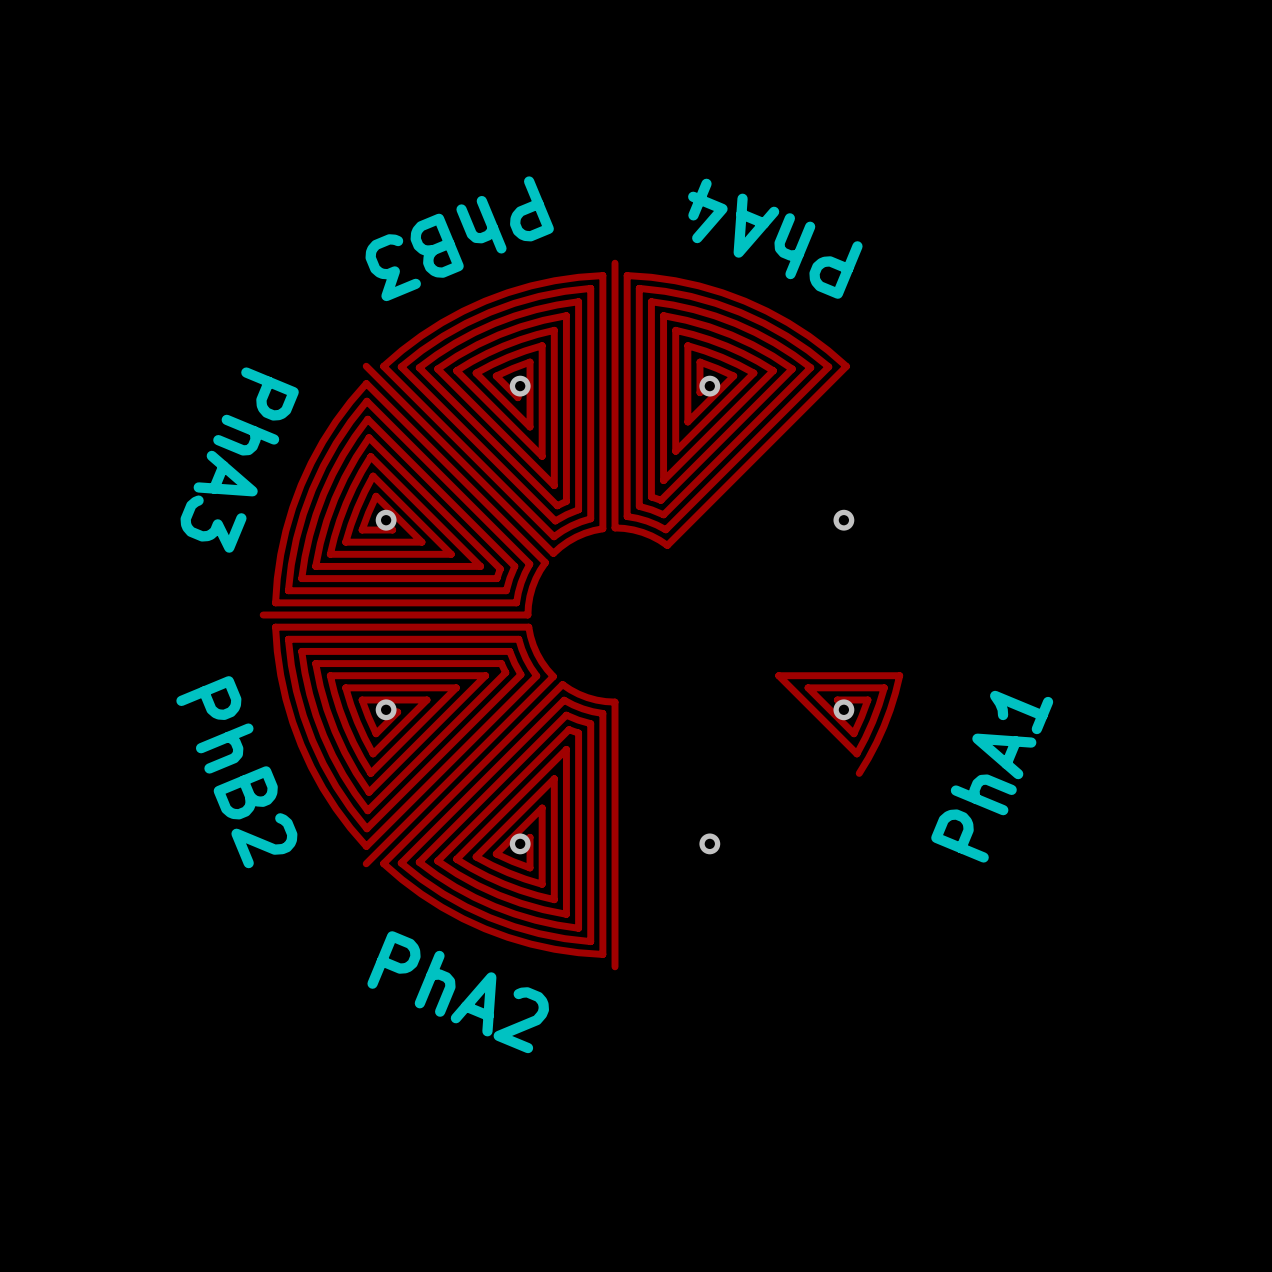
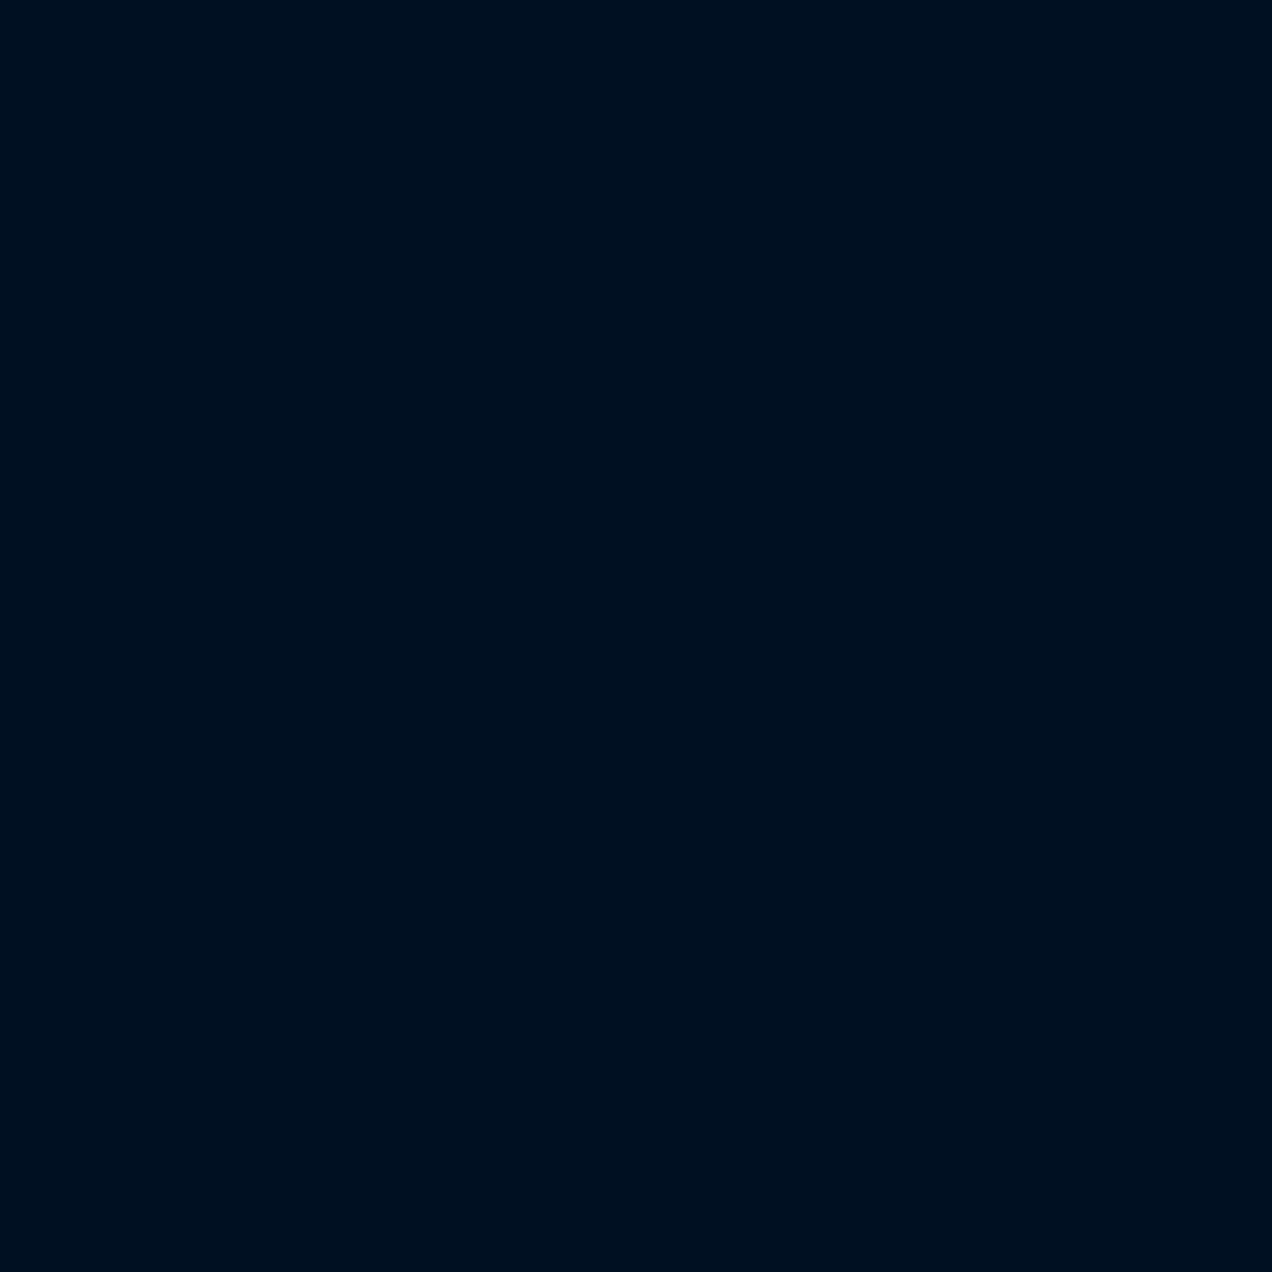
text: PhB3 (459, 238) -> none
text: PhA4 (775, 238) -> none
track: (615, 263) (615, 527) (642, 532) (667, 545) (846, 366) (808, 335) (788, 322) (744, 301) (699, 285) (675, 280) (627, 275) (627, 516) (647, 521) (665, 529) (828, 366) (786, 336) (740, 312) (690, 296) (639, 288) (639, 506) (663, 514) (810, 367) (774, 343) (735, 323) (694, 309) (651, 301) (651, 496) (660, 500) (792, 369) (752, 344) (731, 334) (709, 326) (663, 315) (663, 480) (773, 370) (726, 346) (675, 330) (675, 451) (753, 373) (721, 357) (687, 345) (687, 421) (733, 376) (699, 362) (699, 392) (709, 386) -> none
track: (366, 366) (553, 553) (576, 537) (602, 528) (602, 275) (578, 277) (531, 285) (485, 301) (441, 322) (421, 335) (383, 366) (553, 536) (571, 525) (590, 518) (590, 288) (539, 296) (489, 312) (443, 336) (401, 366) (555, 520) (578, 509) (578, 301) (535, 309) (494, 323) (455, 343) (419, 367) (557, 505) (566, 501) (566, 315) (520, 326) (498, 334) (477, 344) (437, 369) (554, 485) (554, 330) (503, 346) (456, 370) (542, 456) (542, 345) (508, 357) (476, 373) (530, 427) (530, 362) (496, 376) (517, 397) (520, 386) -> none
via: (520, 386) -> none
via: (709, 386) -> none
text: PhA3 (239, 460) -> none
track: (386, 520) (392, 530) (362, 530) (376, 496) (421, 542) (345, 542) (357, 508) (373, 476) (451, 554) (330, 554) (346, 503) (370, 456) (480, 566) (315, 566) (326, 520) (334, 498) (344, 477) (369, 437) (500, 569) (496, 578) (301, 578) (309, 535) (323, 494) (343, 455) (367, 419) (514, 566) (506, 590) (288, 590) (296, 539) (312, 489) (336, 443) (366, 401) (529, 564) (521, 582) (516, 602) (275, 602) (280, 554) (285, 531) (301, 485) (311, 462) (335, 421) (366, 383) (545, 562) (532, 587) (527, 615) (263, 615) -> none
via: (386, 520) -> none
via: (843, 520) -> none
track: (386, 709) (397, 712) (376, 733) (362, 699) (427, 699) (373, 753) (357, 721) (345, 687) (456, 687) (370, 773) (346, 726) (330, 675) (485, 675) (369, 792) (356, 772) (334, 731) (326, 709) (315, 663) (501, 663) (505, 672) (367, 810) (343, 774) (323, 735) (309, 694) (301, 651) (509, 651) (520, 674) (366, 828) (336, 786) (312, 740) (296, 690) (288, 639) (518, 639) (525, 658) (536, 676) (366, 846) (335, 808) (322, 788) (301, 744) (285, 699) (277, 651) (275, 627) (528, 627) (537, 653) (553, 676) (366, 863) -> none
via: (386, 709) -> none
track: (843, 709) (837, 699) (867, 699) (853, 733) (808, 687) (884, 687) (872, 721) (856, 753) (778, 675) (899, 675) (883, 726) (859, 773) -> none
via: (843, 709) -> none
text: PhB2 (236, 772) -> none
text: PhA1 (992, 776) -> none
track: (520, 843) (530, 837) (530, 867) (496, 853) (542, 808) (542, 884) (508, 872) (476, 856) (554, 778) (554, 899) (503, 883) (456, 859) (566, 749) (566, 914) (520, 903) (498, 895) (477, 885) (437, 861) (569, 729) (578, 733) (578, 928) (535, 920) (494, 906) (455, 886) (419, 862) (566, 715) (590, 723) (590, 941) (539, 933) (489, 917) (443, 893) (401, 863) (564, 700) (582, 708) (602, 713) (602, 954) (554, 949) (531, 944) (485, 928) (462, 918) (421, 894) (383, 863) (562, 684) (587, 697) (615, 702) (615, 966) -> none
via: (520, 843) -> none
via: (709, 843) -> none
text: PhA2 (458, 992) -> none

